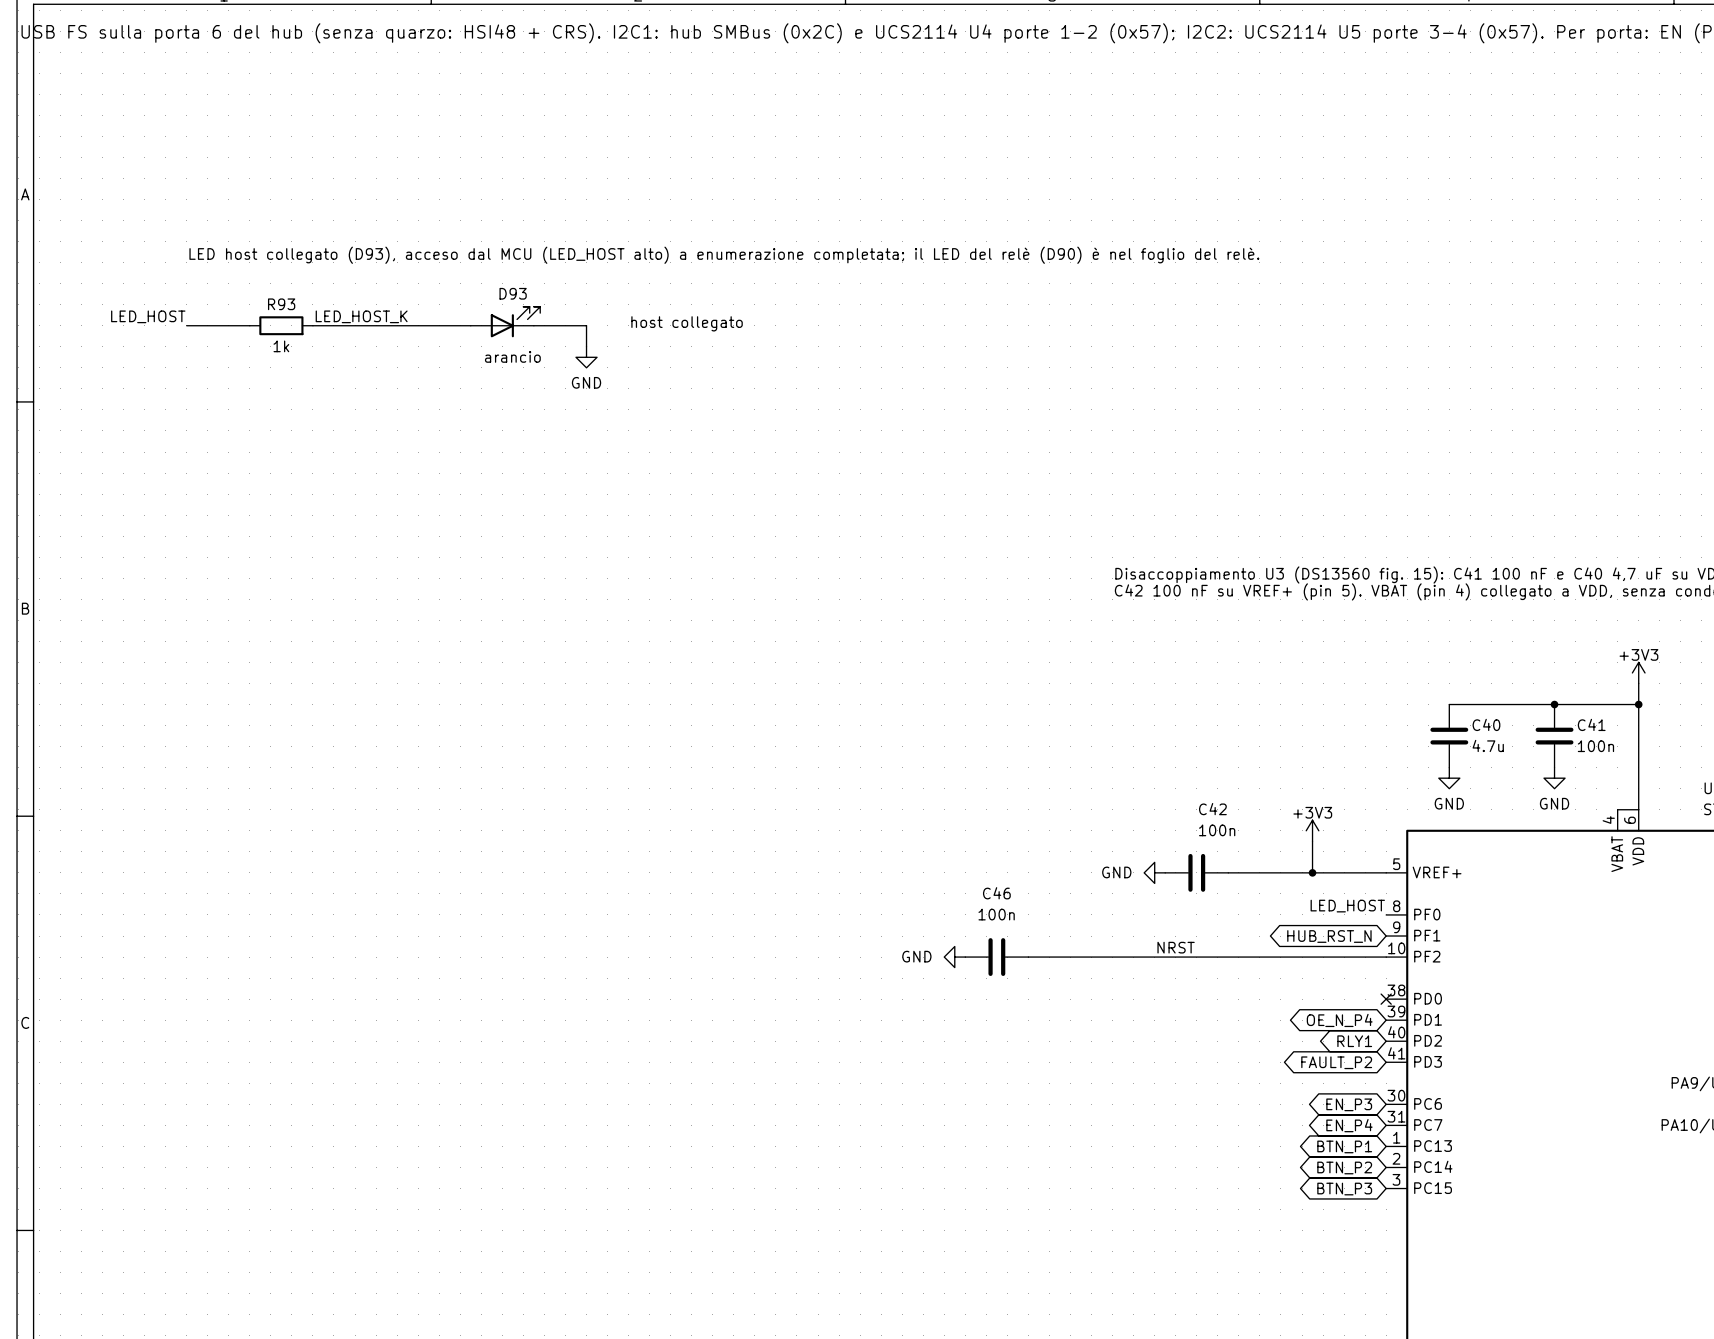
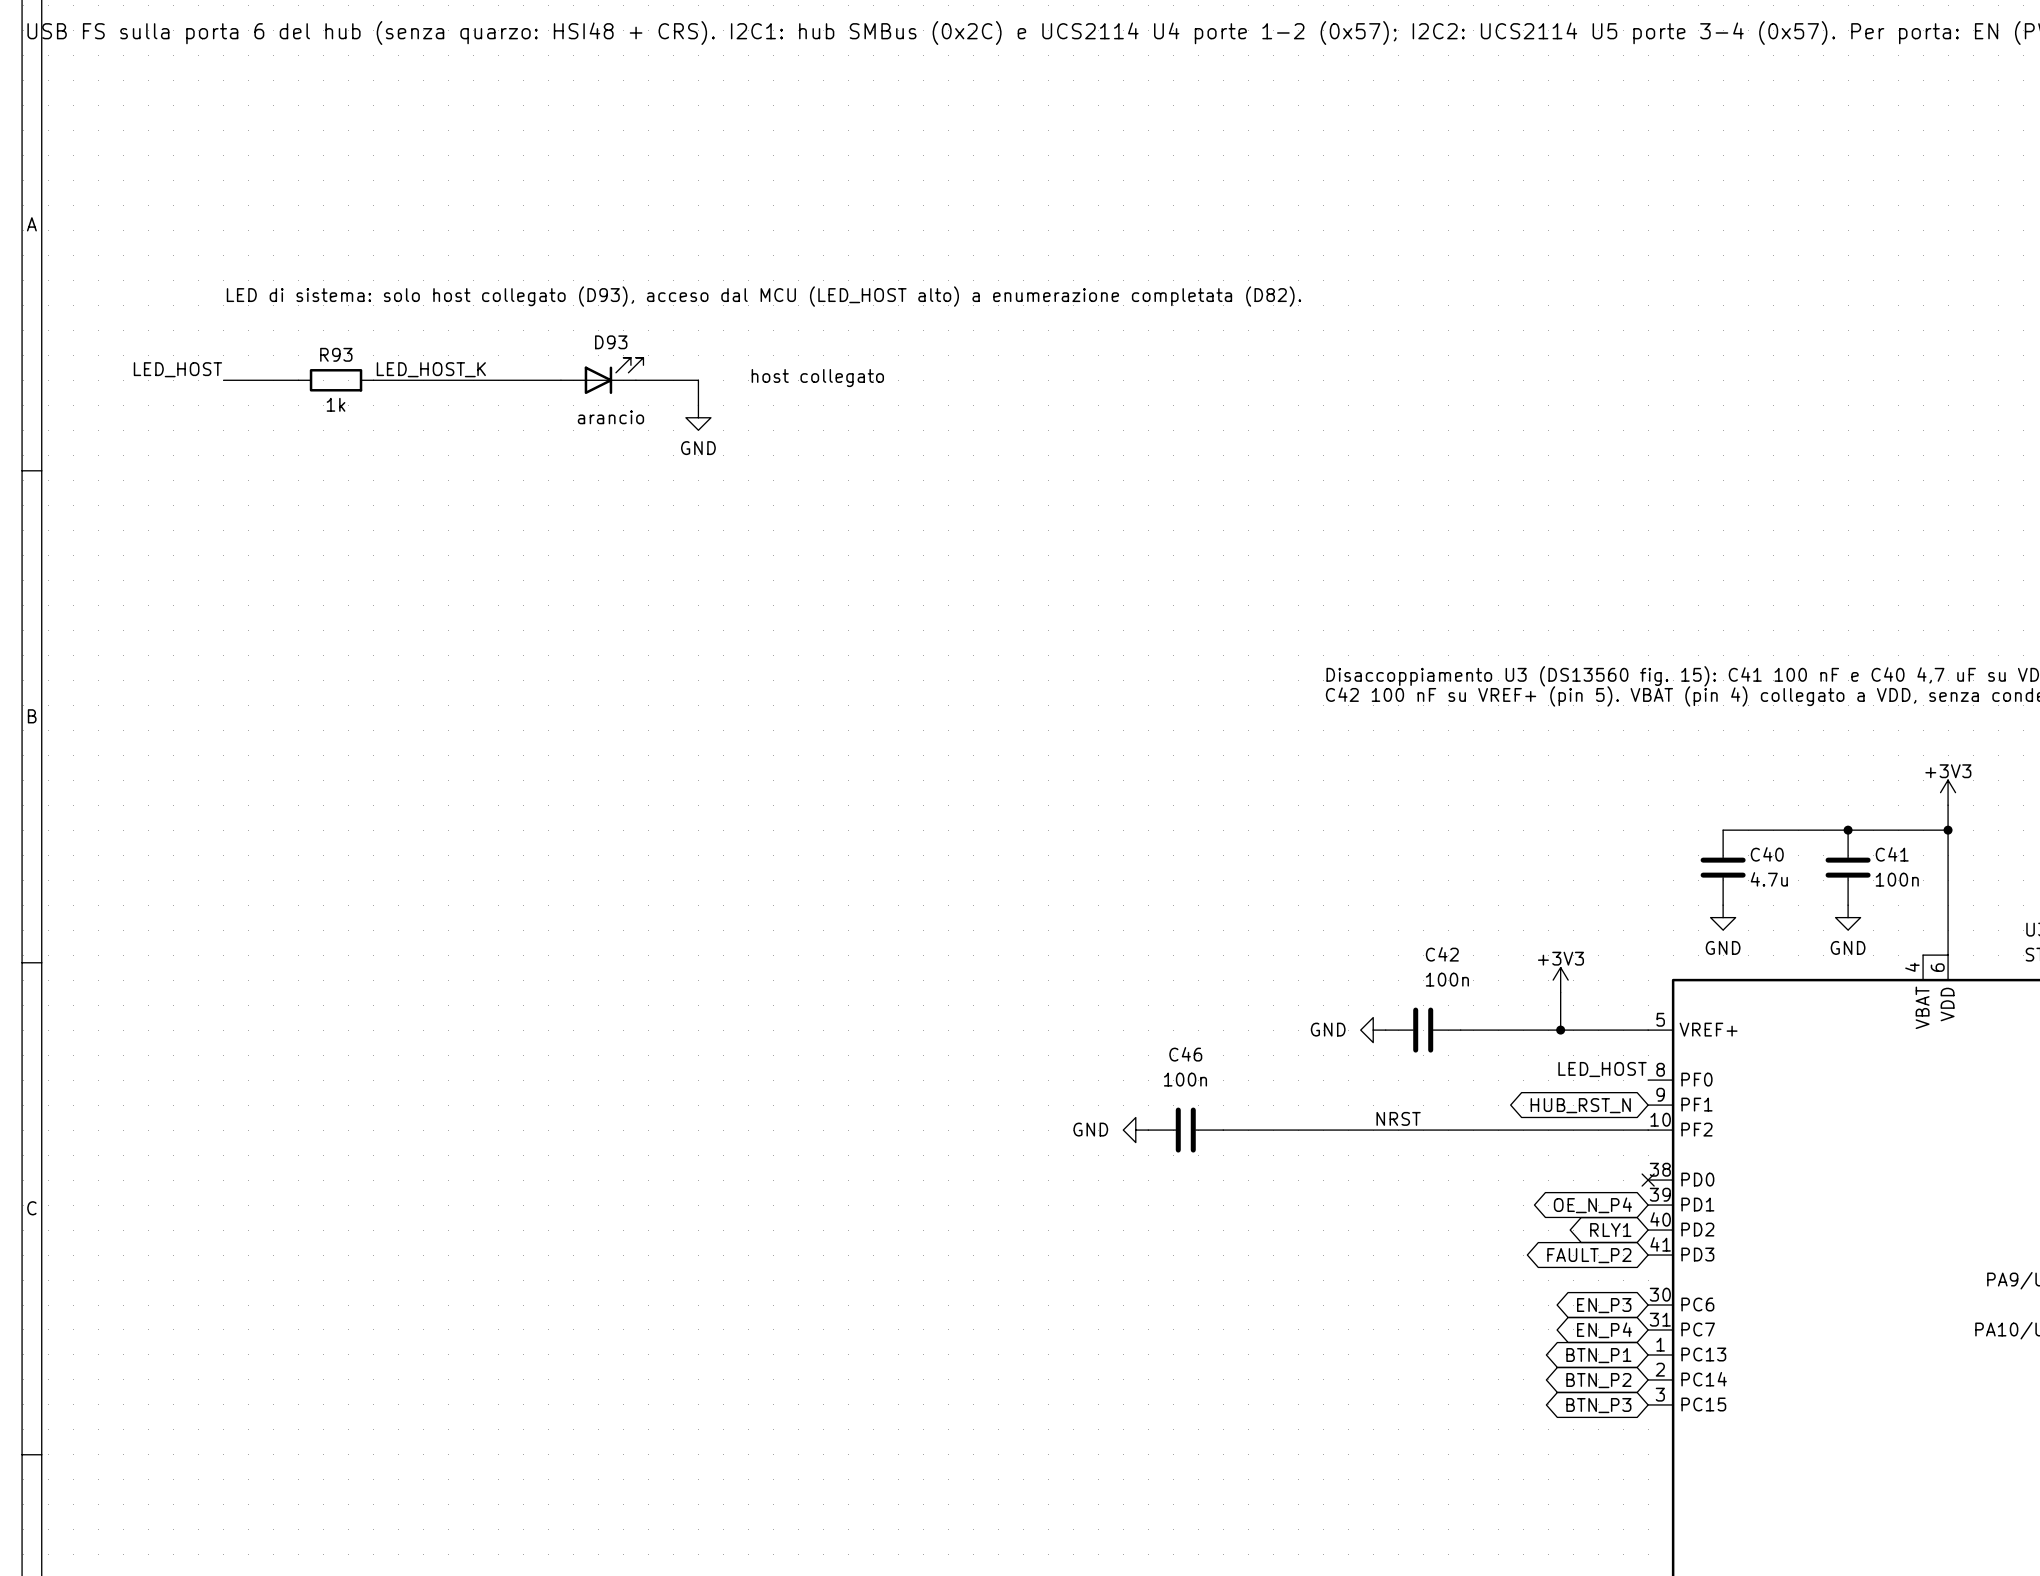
text: LED host collegato (D93), acceso dal MCU (LED_HOST alto) a enumerazione completata; il LED del relè (D90) è nel foglio del relè. (724, 255) -> LED di sistema: solo host collegato (D93), acceso dal MCU (LED_HOST alto) a enumerazione completata (D82). (763, 296)

